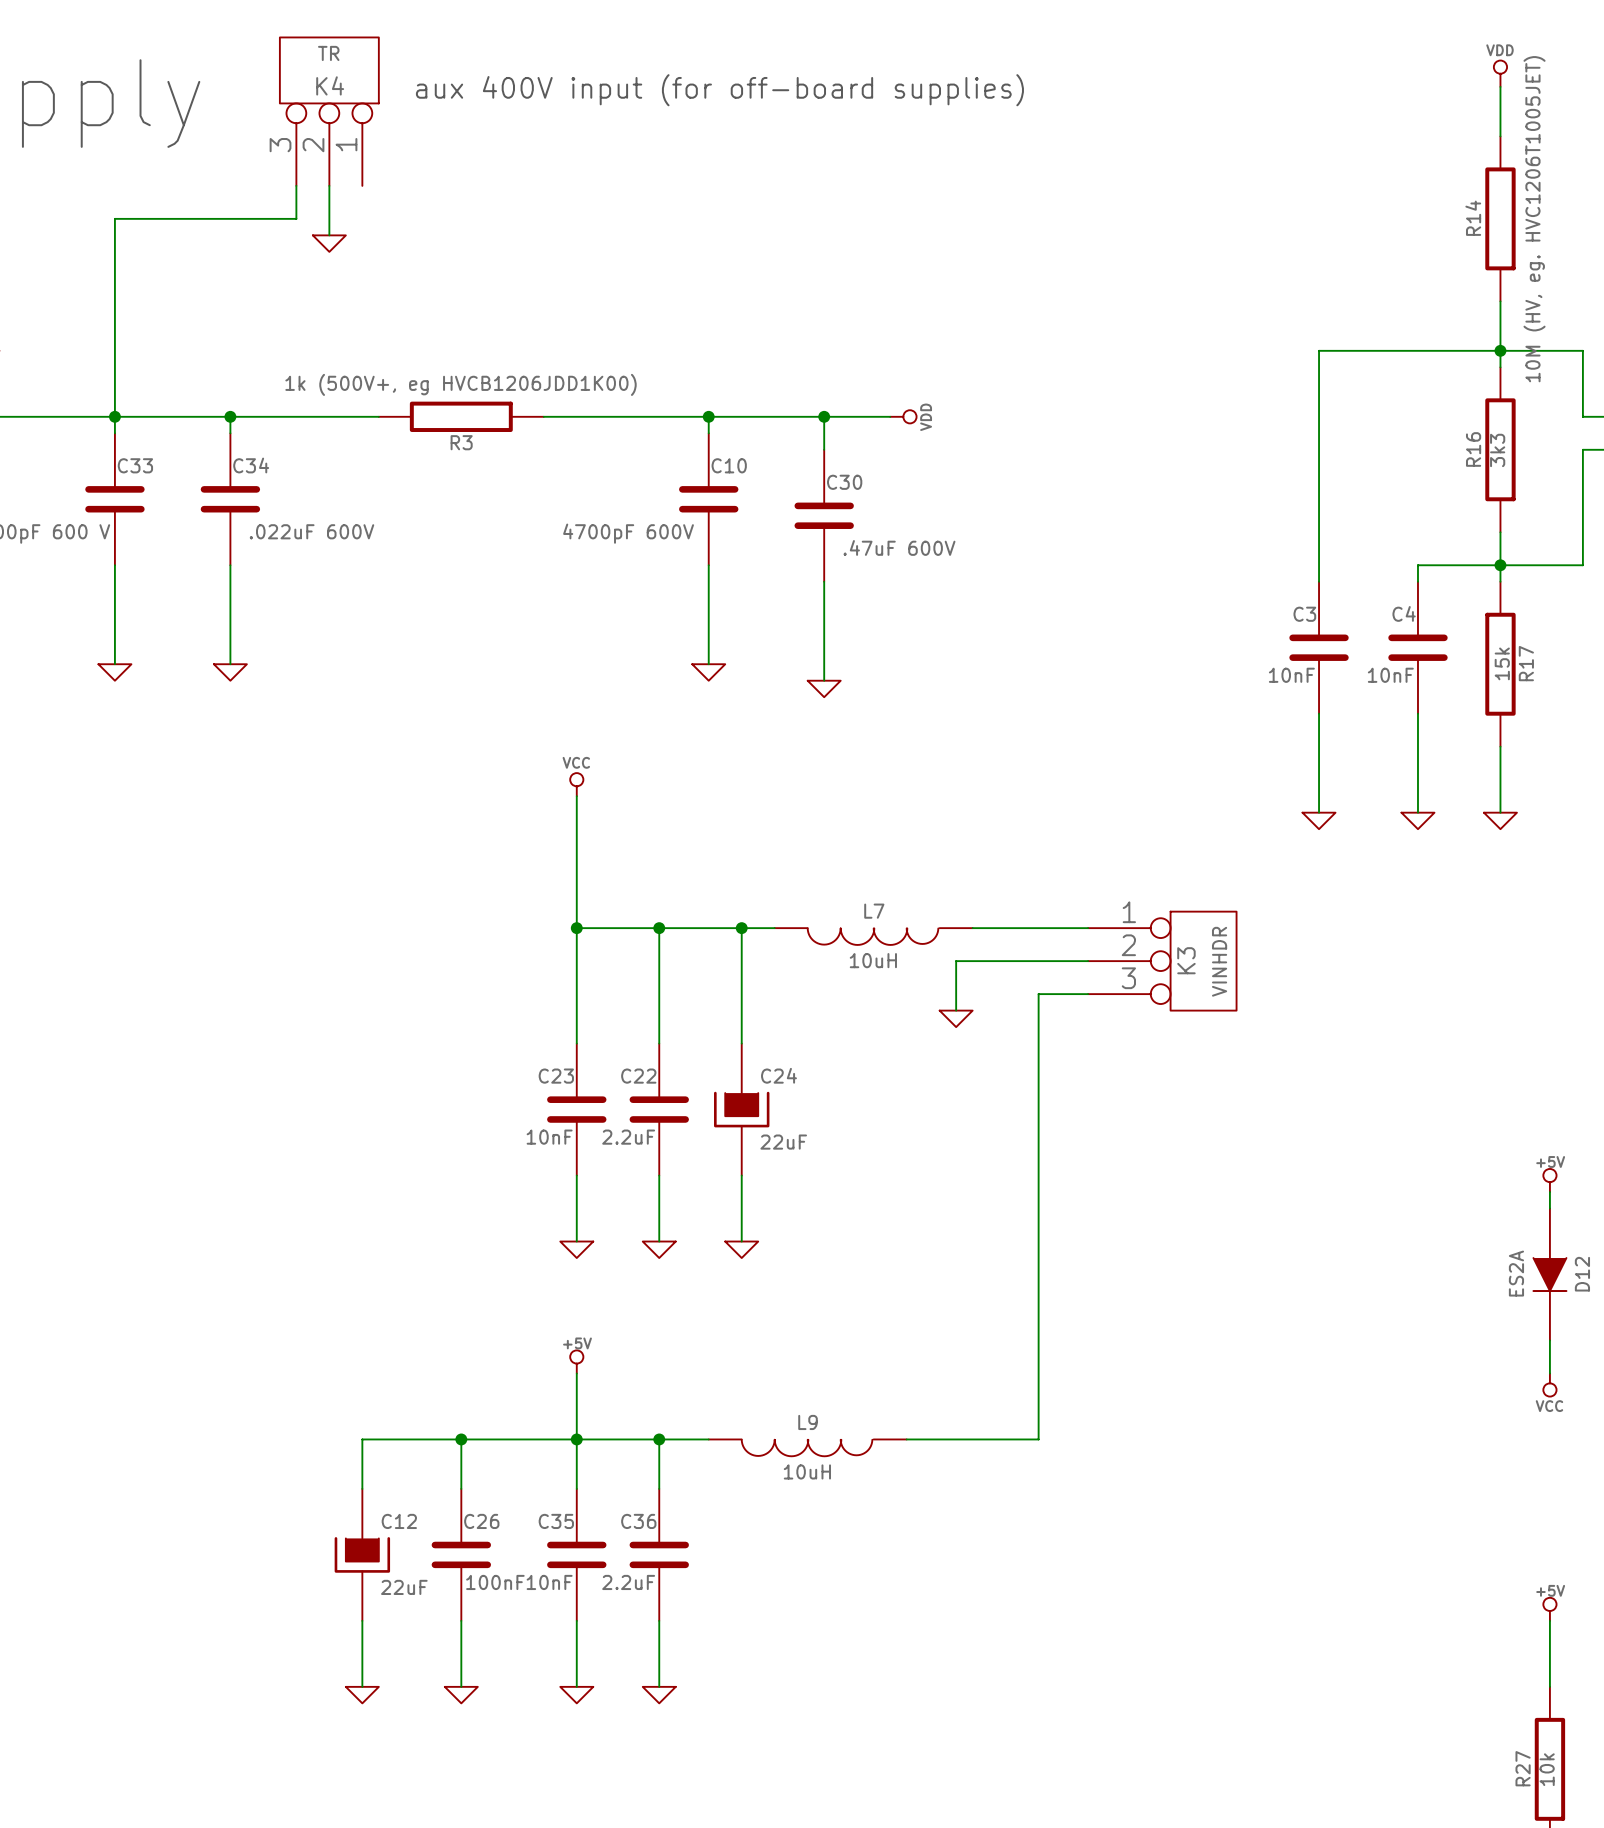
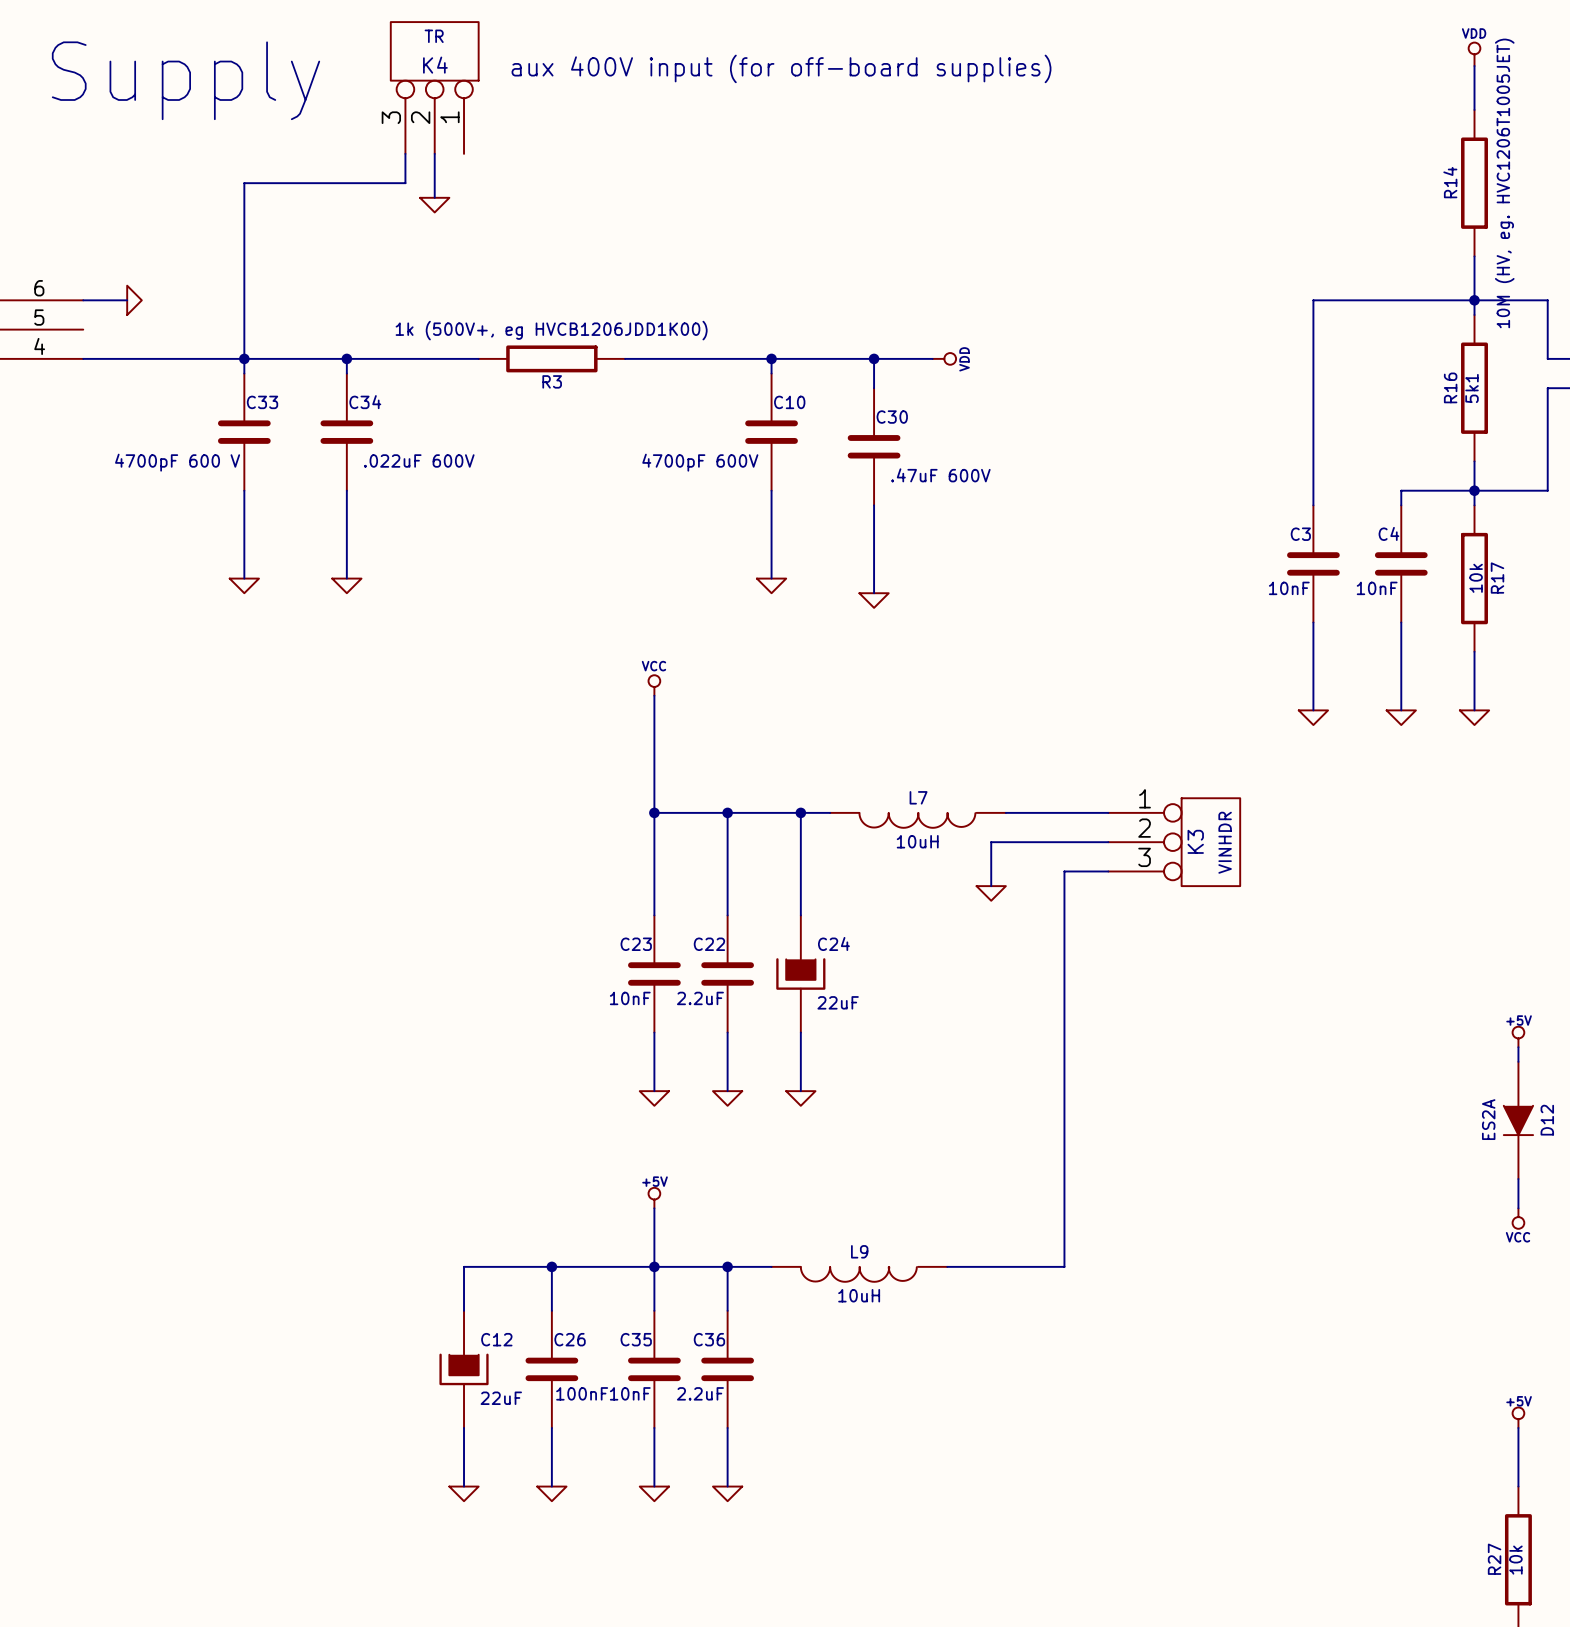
R16 value: 3k3 (1497, 450) -> 5k1 (1472, 388)
R17 value: 15k (1502, 663) -> 10k (1476, 578)

